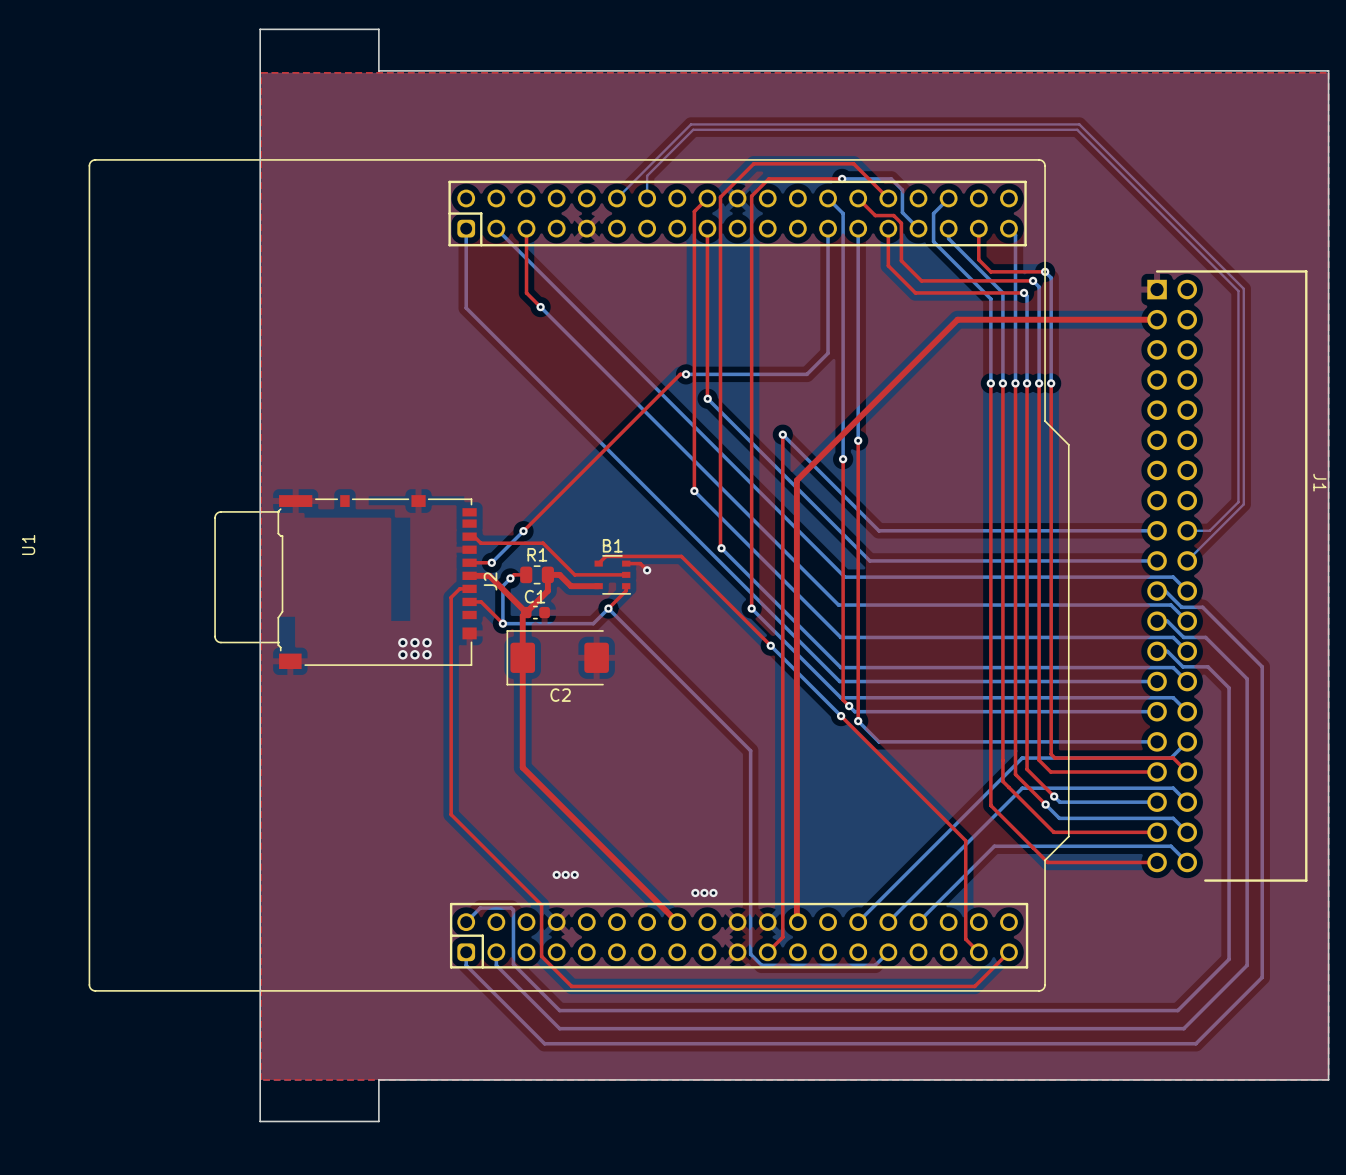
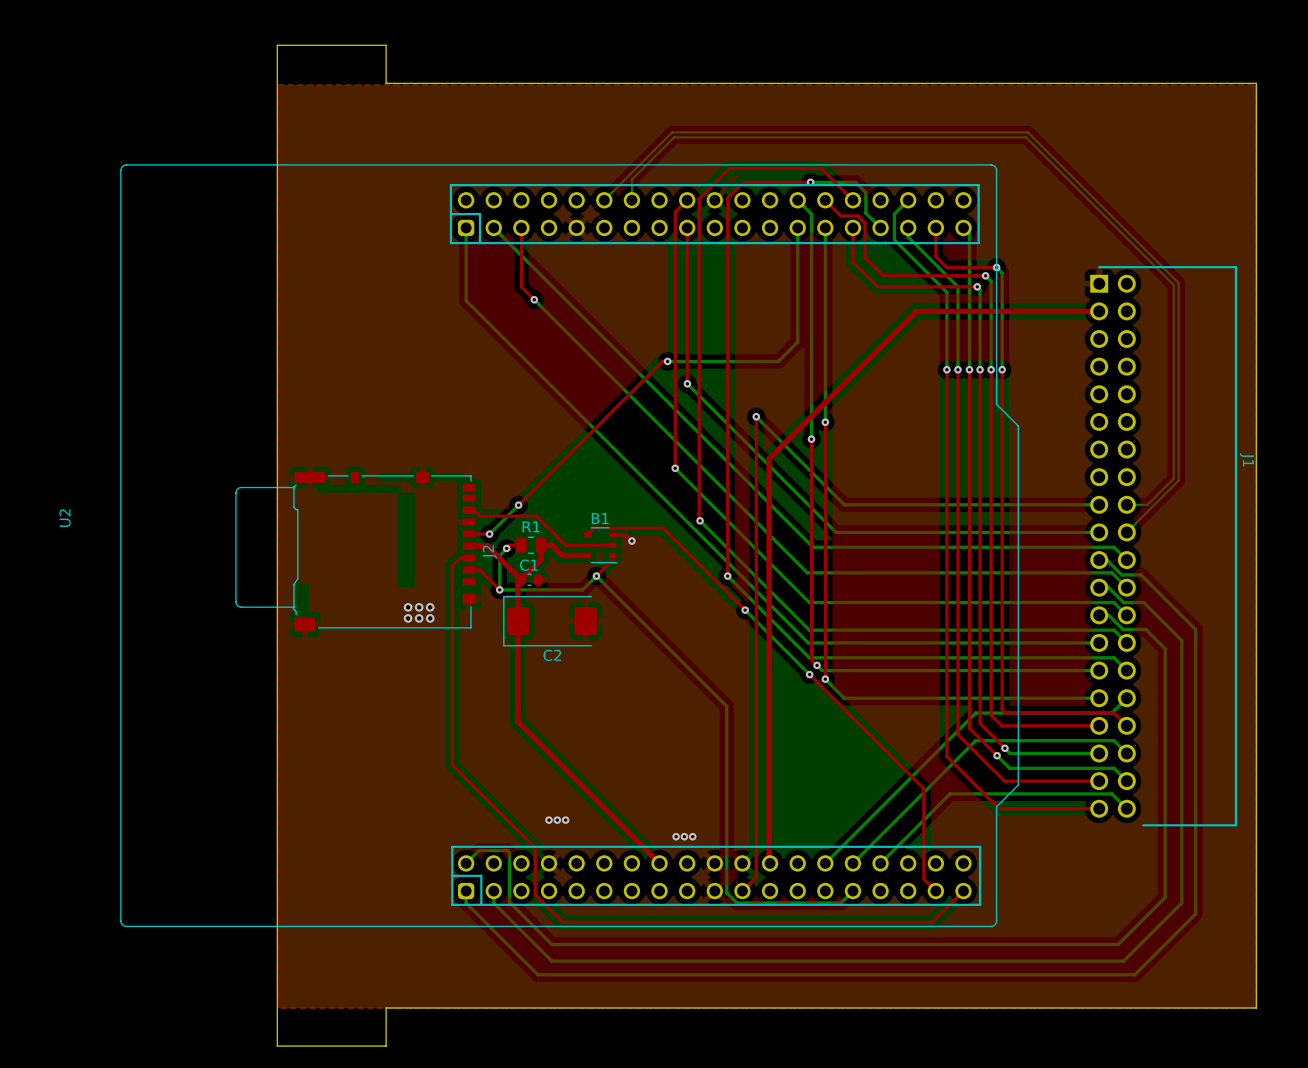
U1 name: U1 (28, 544) -> U2 (65, 518)

